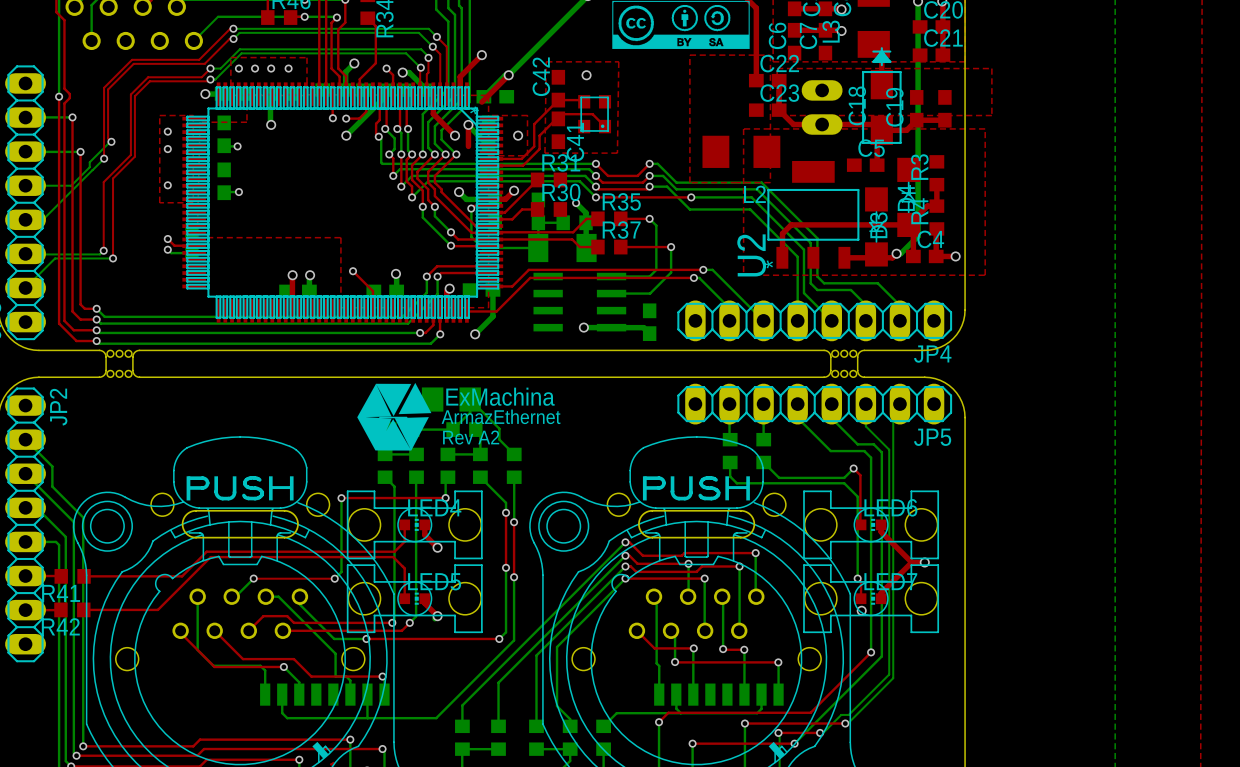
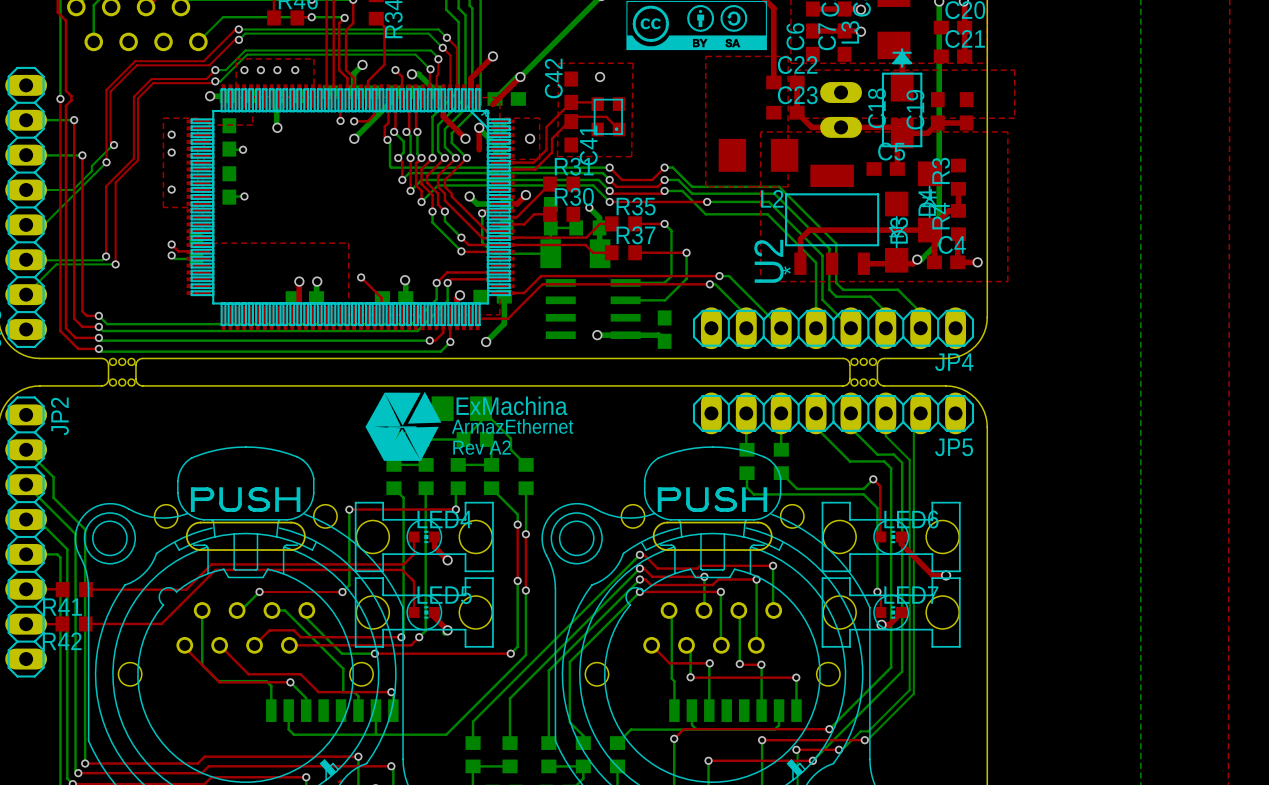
top track: (911, 562) (881, 593) (881, 598) -> (881, 624) (889, 624) (901, 612)
top track: (871, 652) (810, 712) -> none
bottom track: none -> (891, 667) (829, 729)
via: (871, 652) -> none
via: none -> (829, 729)

